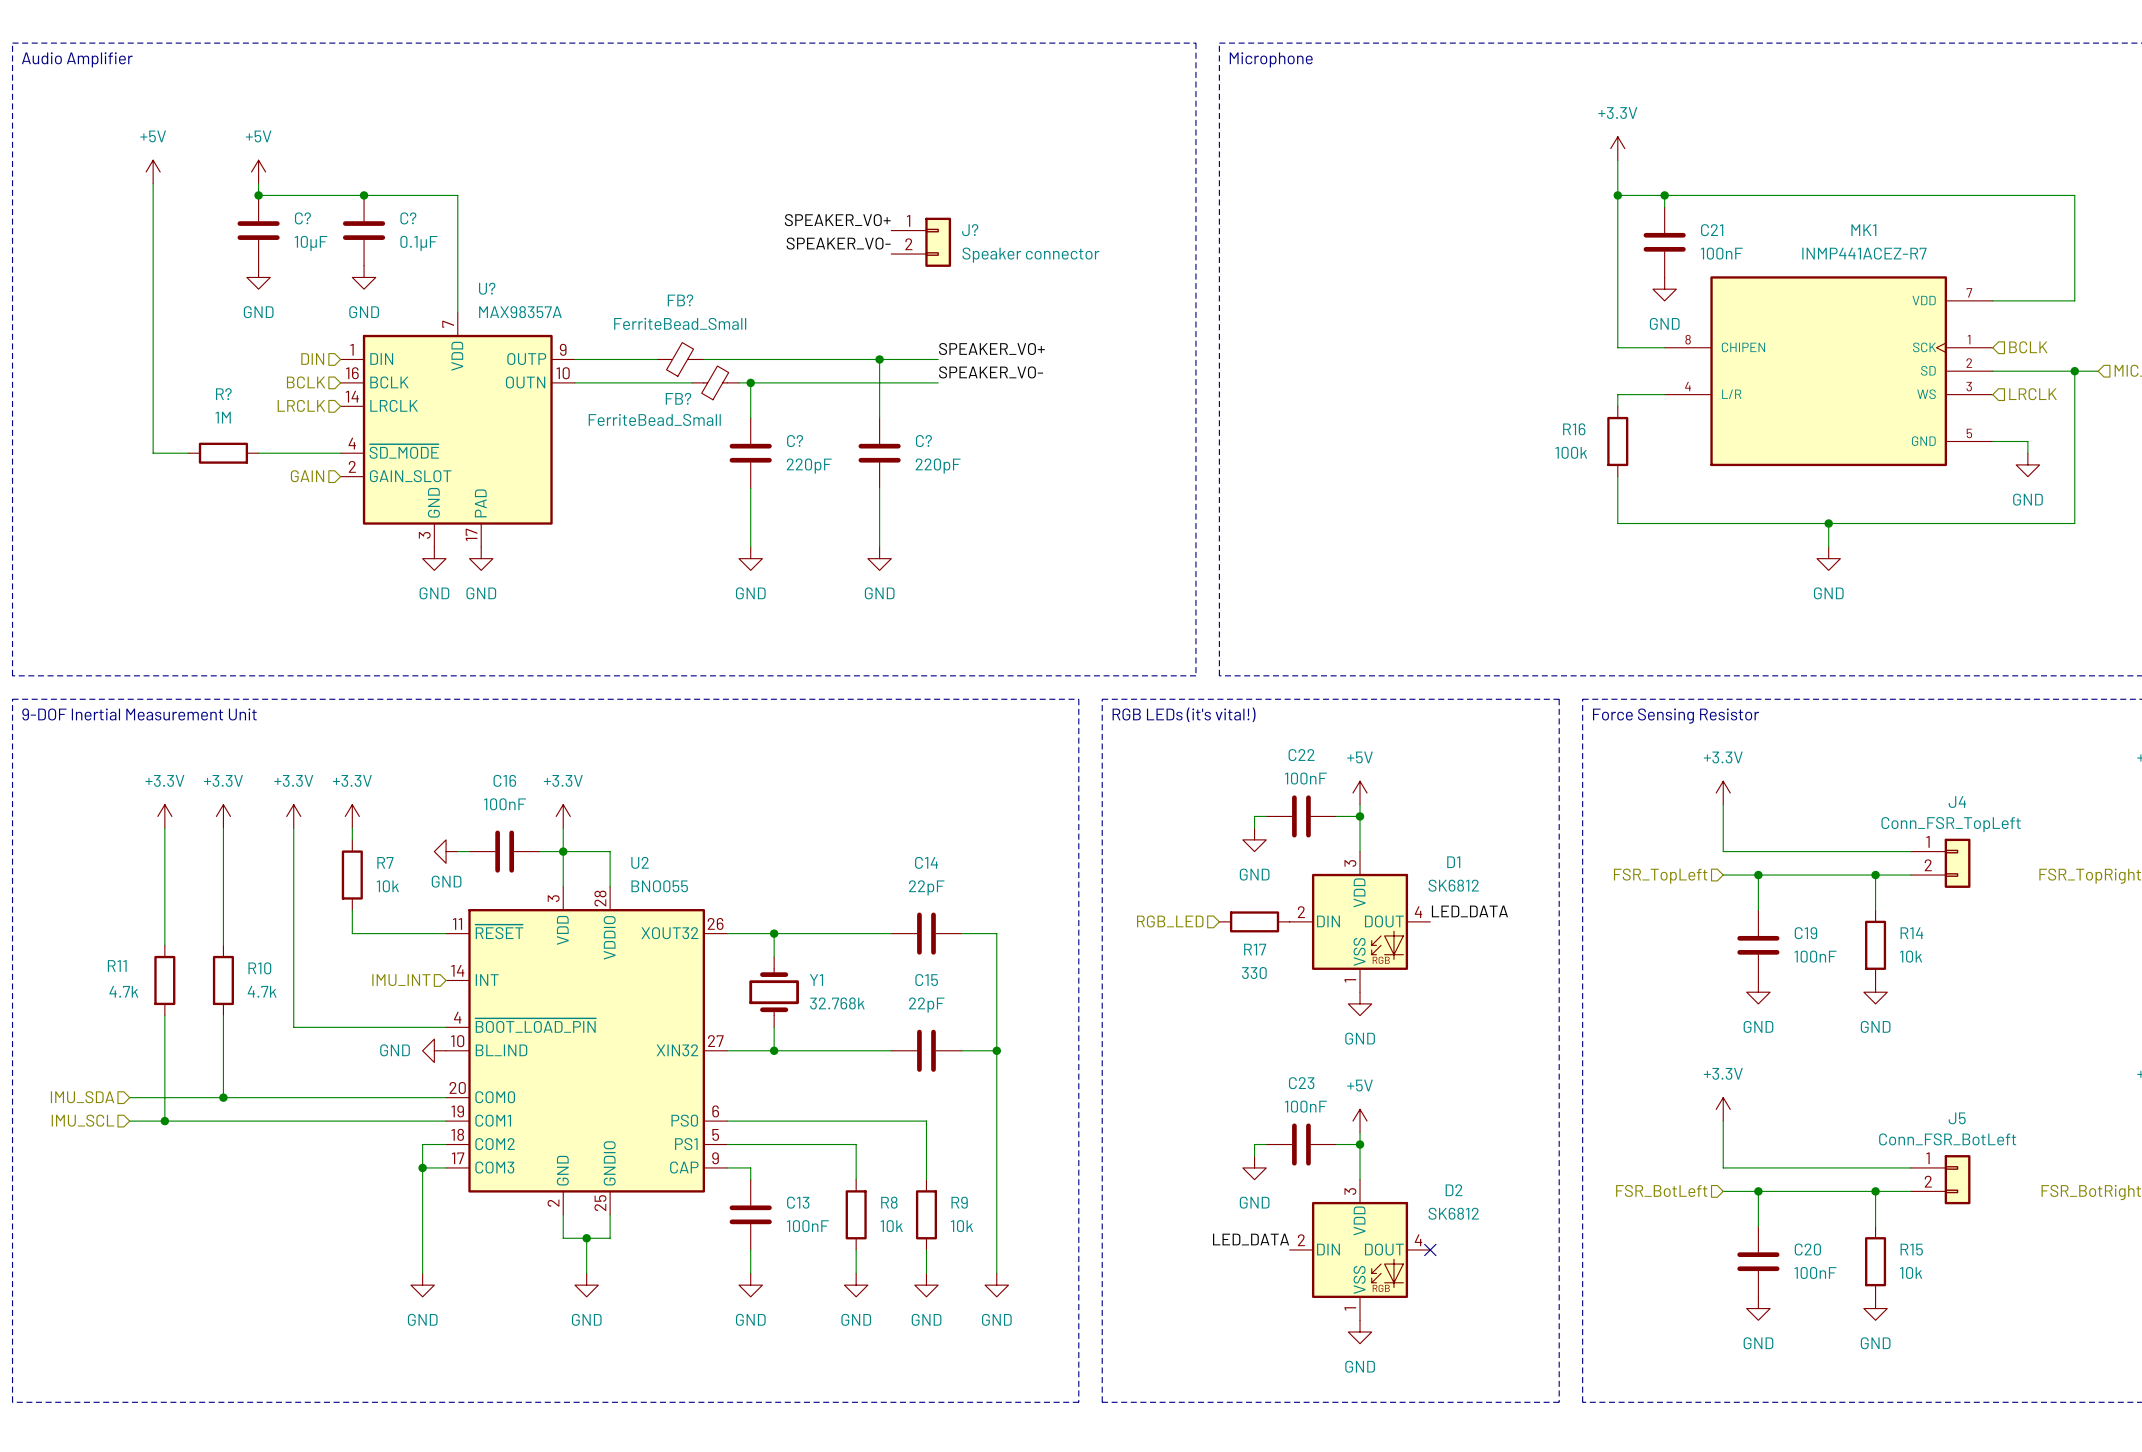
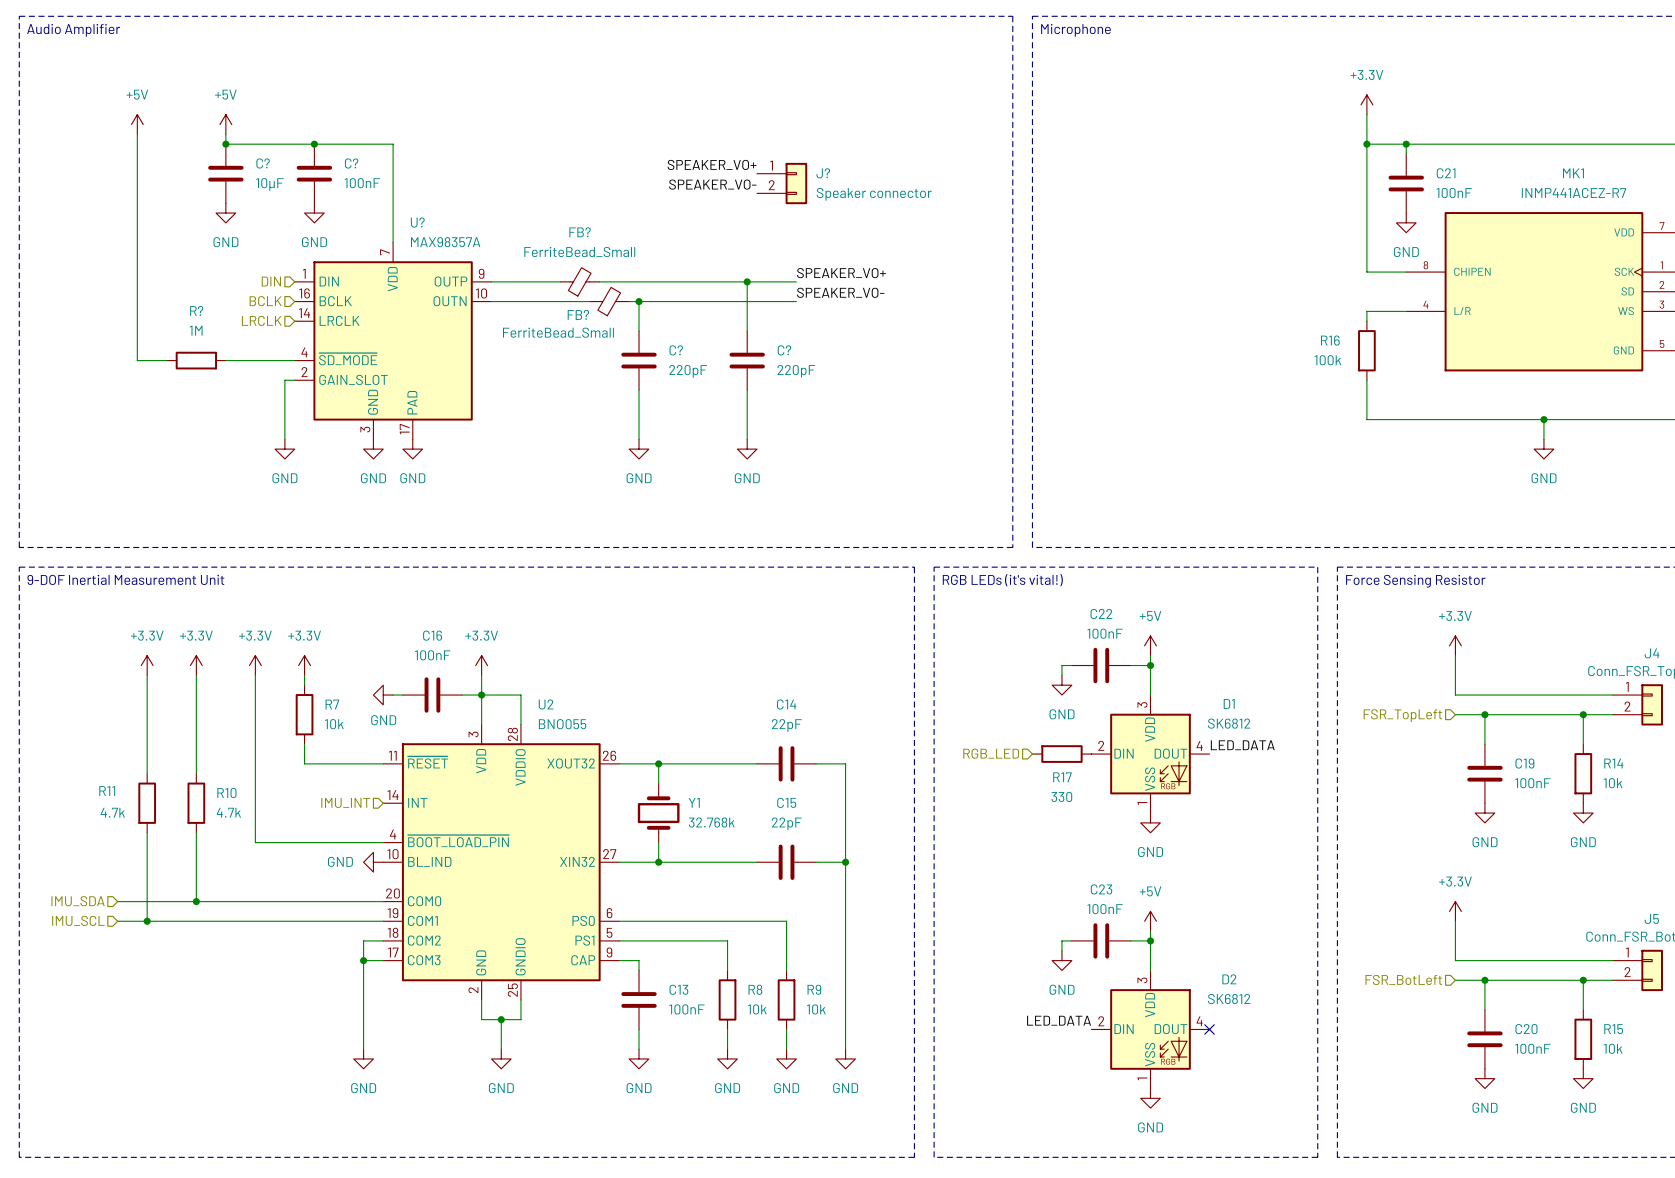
C? value: 0.1µF (418, 243) -> 100nF (362, 183)
hierarchical label: GAIN (307, 476) -> none
wire: none -> (294, 380) (284, 380) (284, 439)
power symbol: none -> GND (284, 449)

